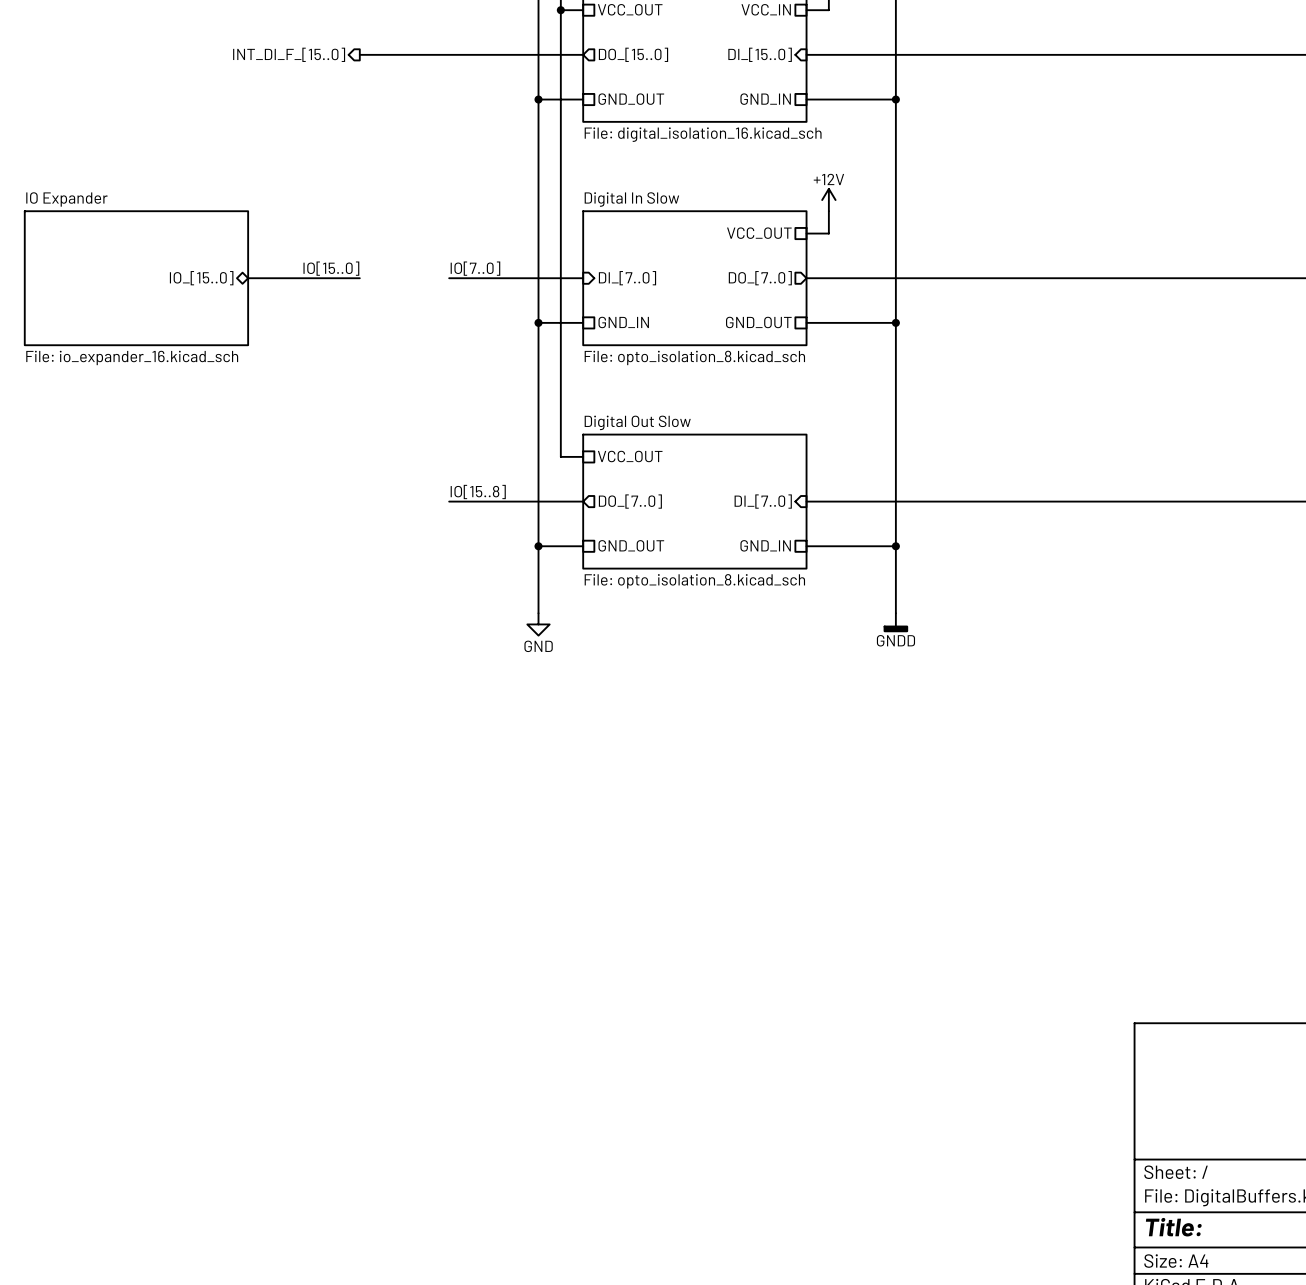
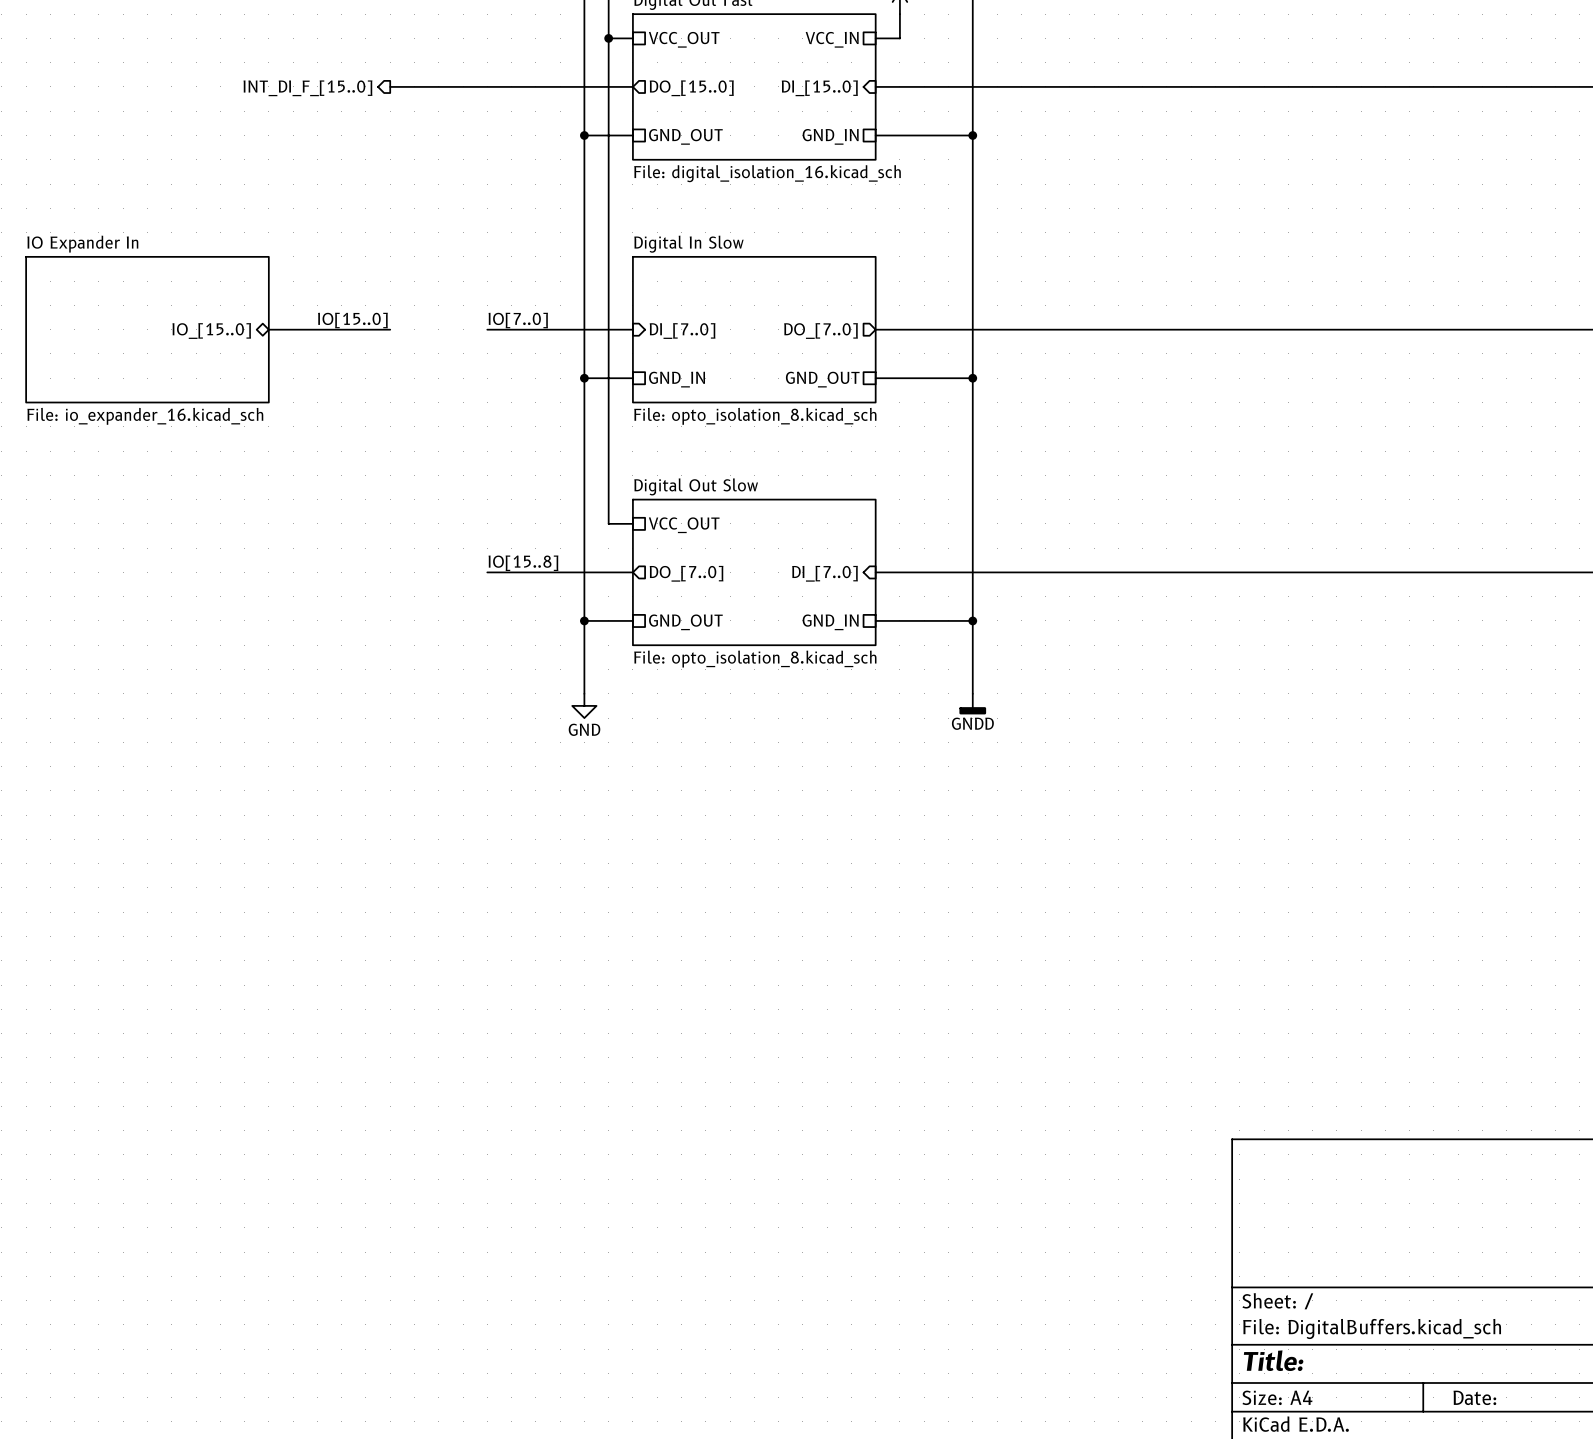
sheet IO Expander name: IO Expander (66, 199) -> IO Expander In (82, 244)
power symbol: +12V (828, 200) -> none
wire: (828, 211) (828, 233) (806, 233) -> none
sheet pin: VCC_OUT (759, 233) -> none

